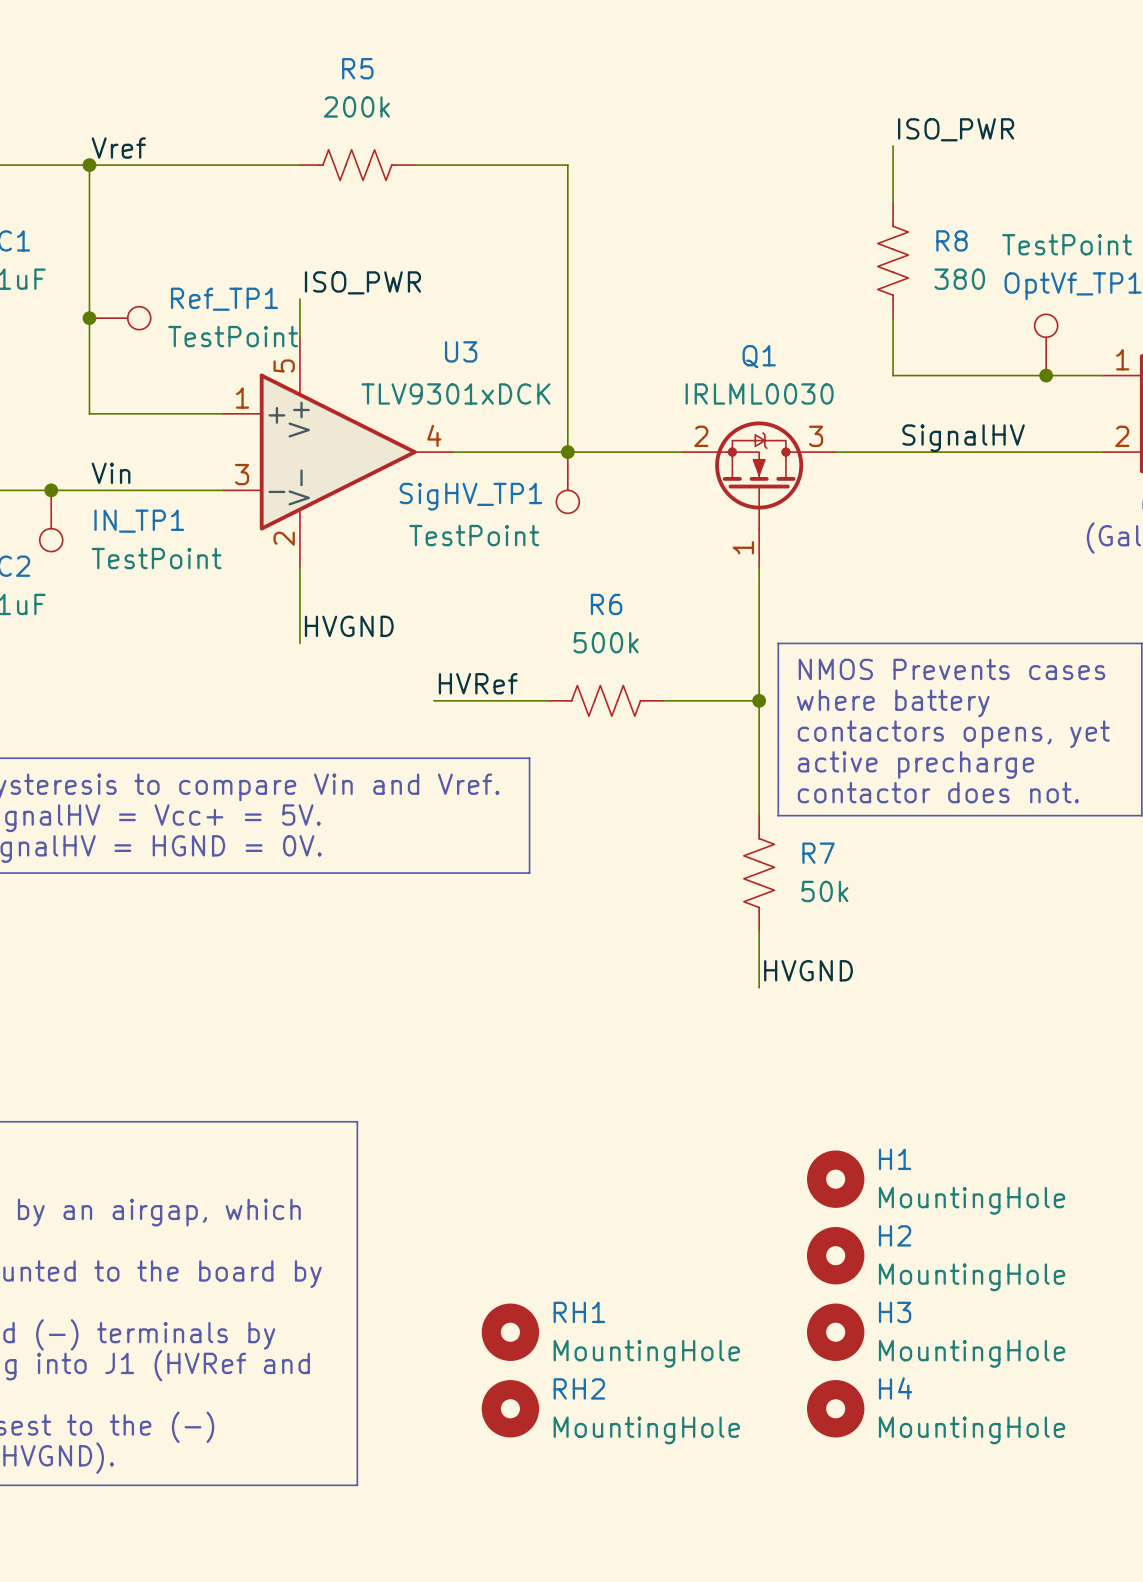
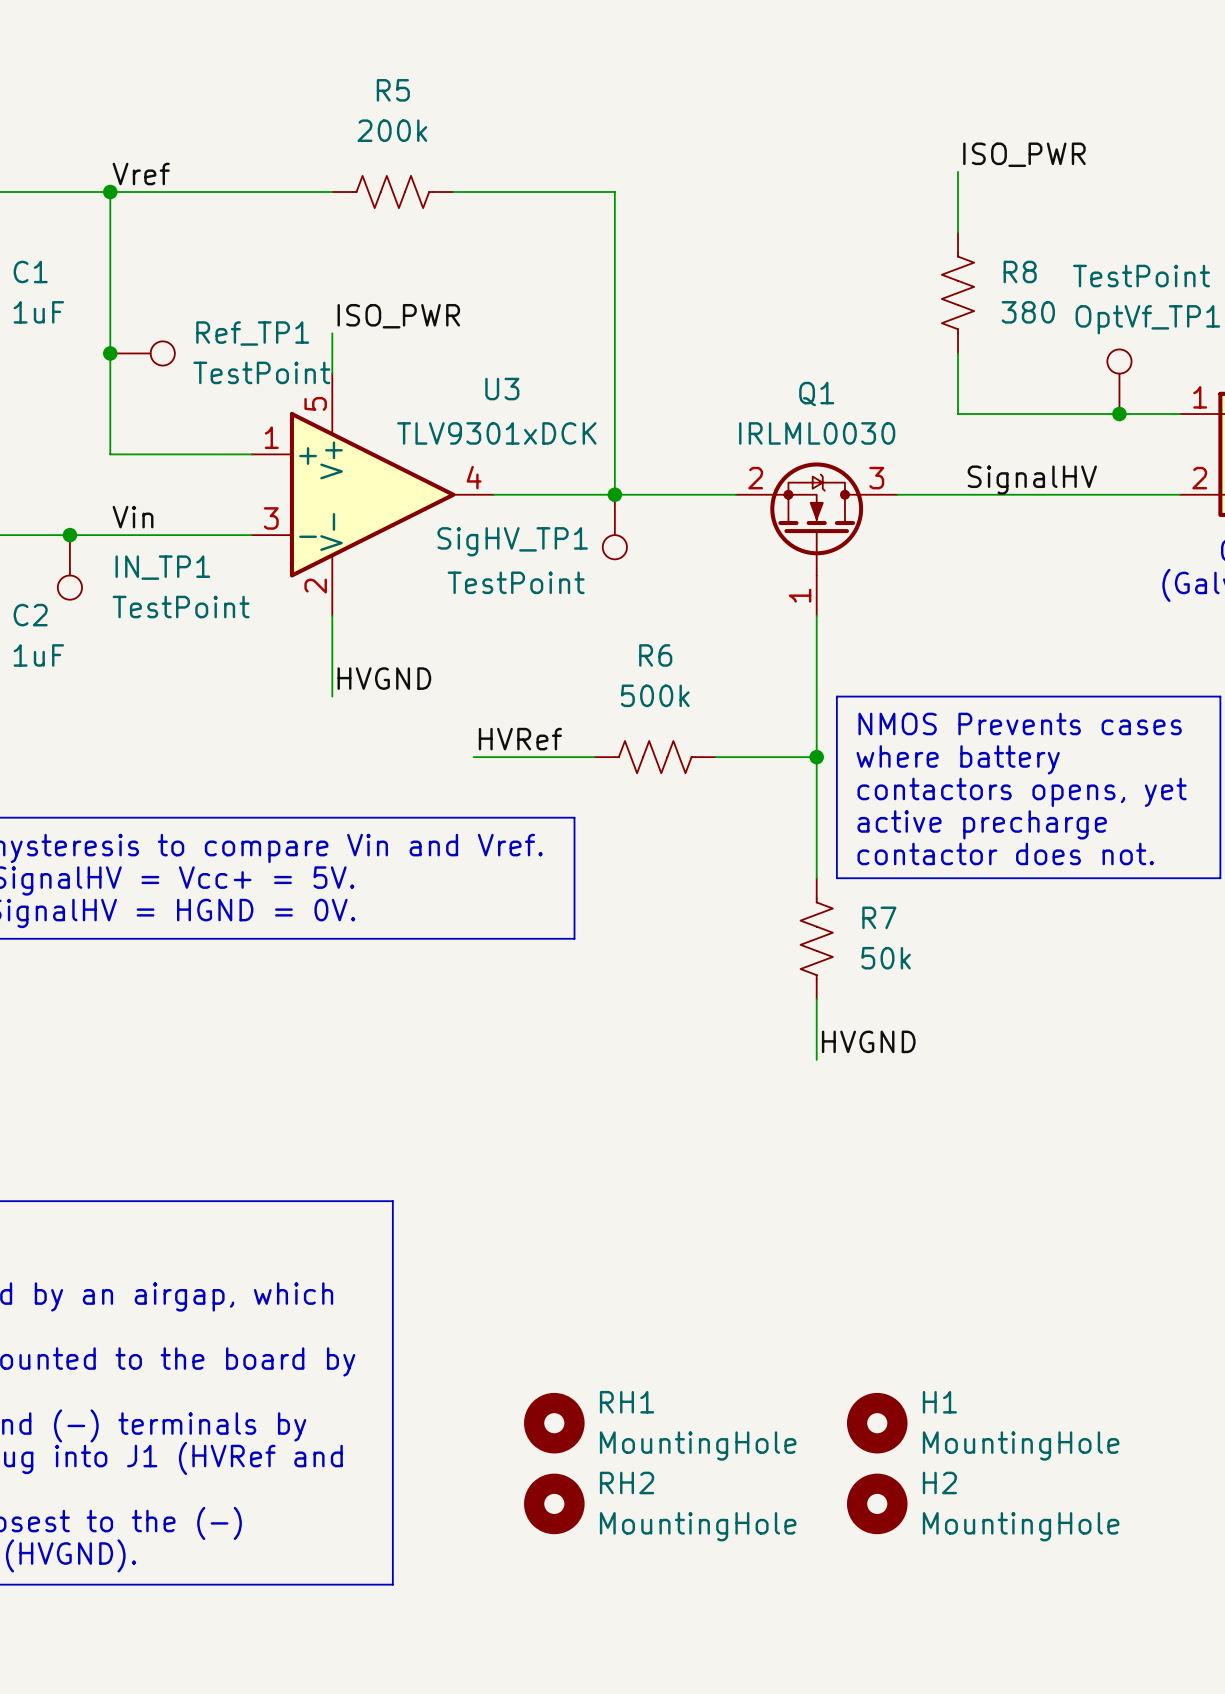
H1 position: (835, 1179) -> (877, 1423)
H2 position: (835, 1255) -> (877, 1503)
H3: MountingHole (835, 1332) -> none
H4: MountingHole (835, 1408) -> none

